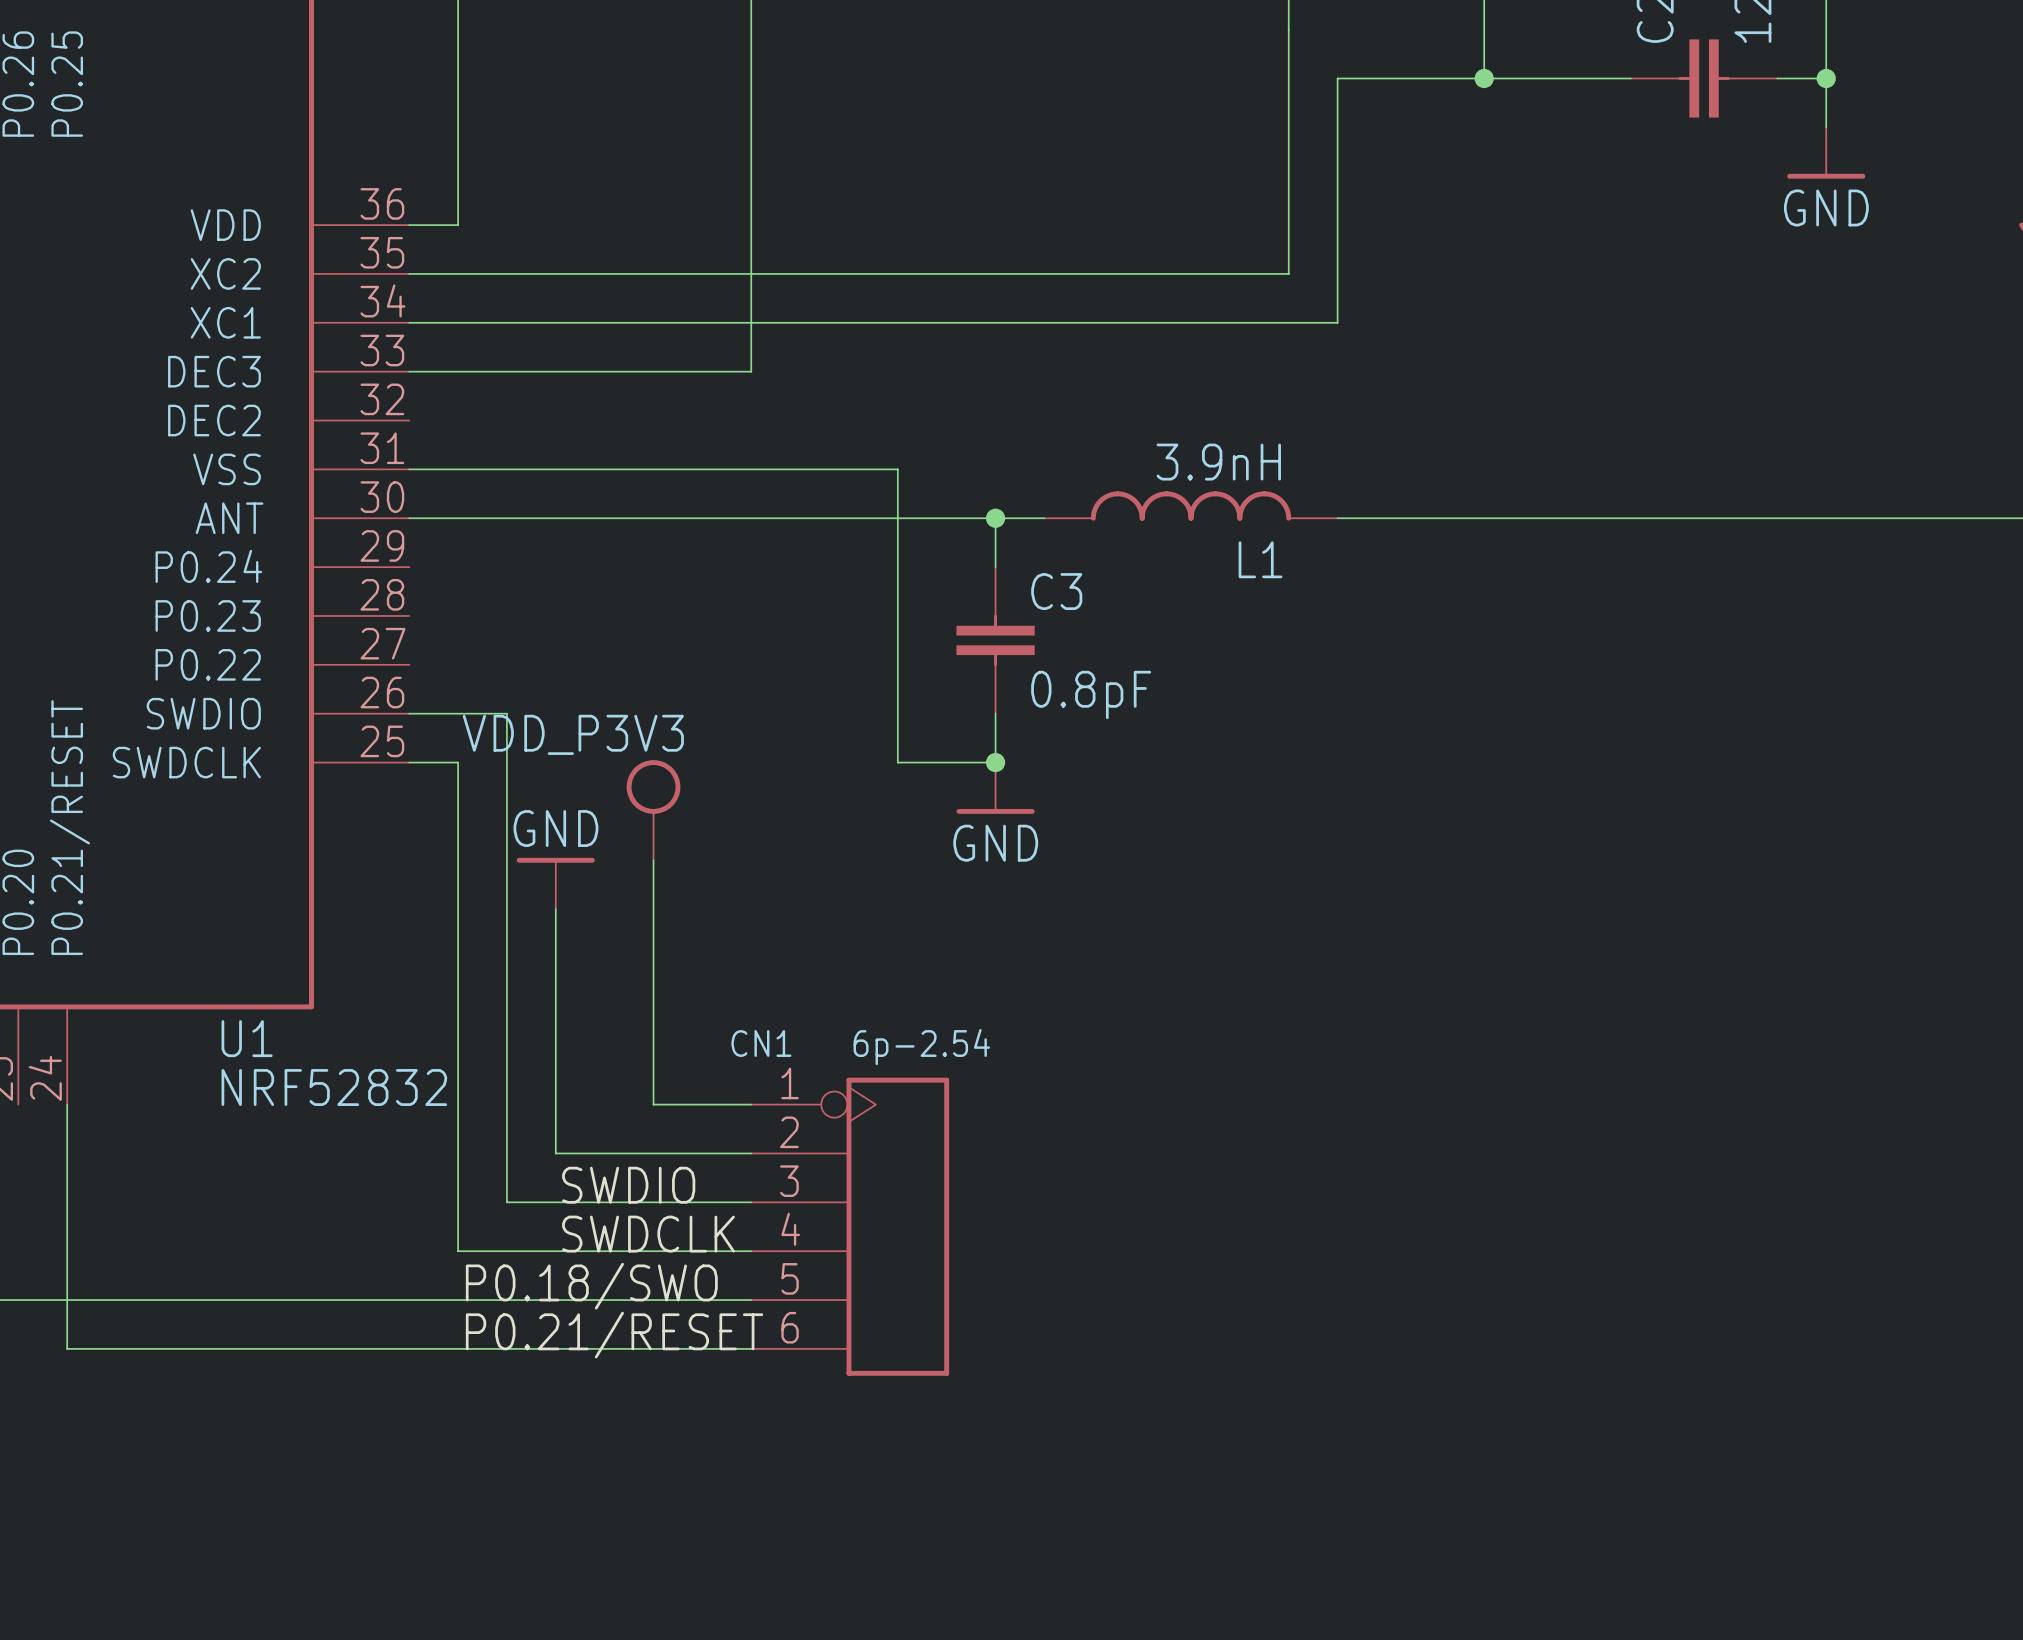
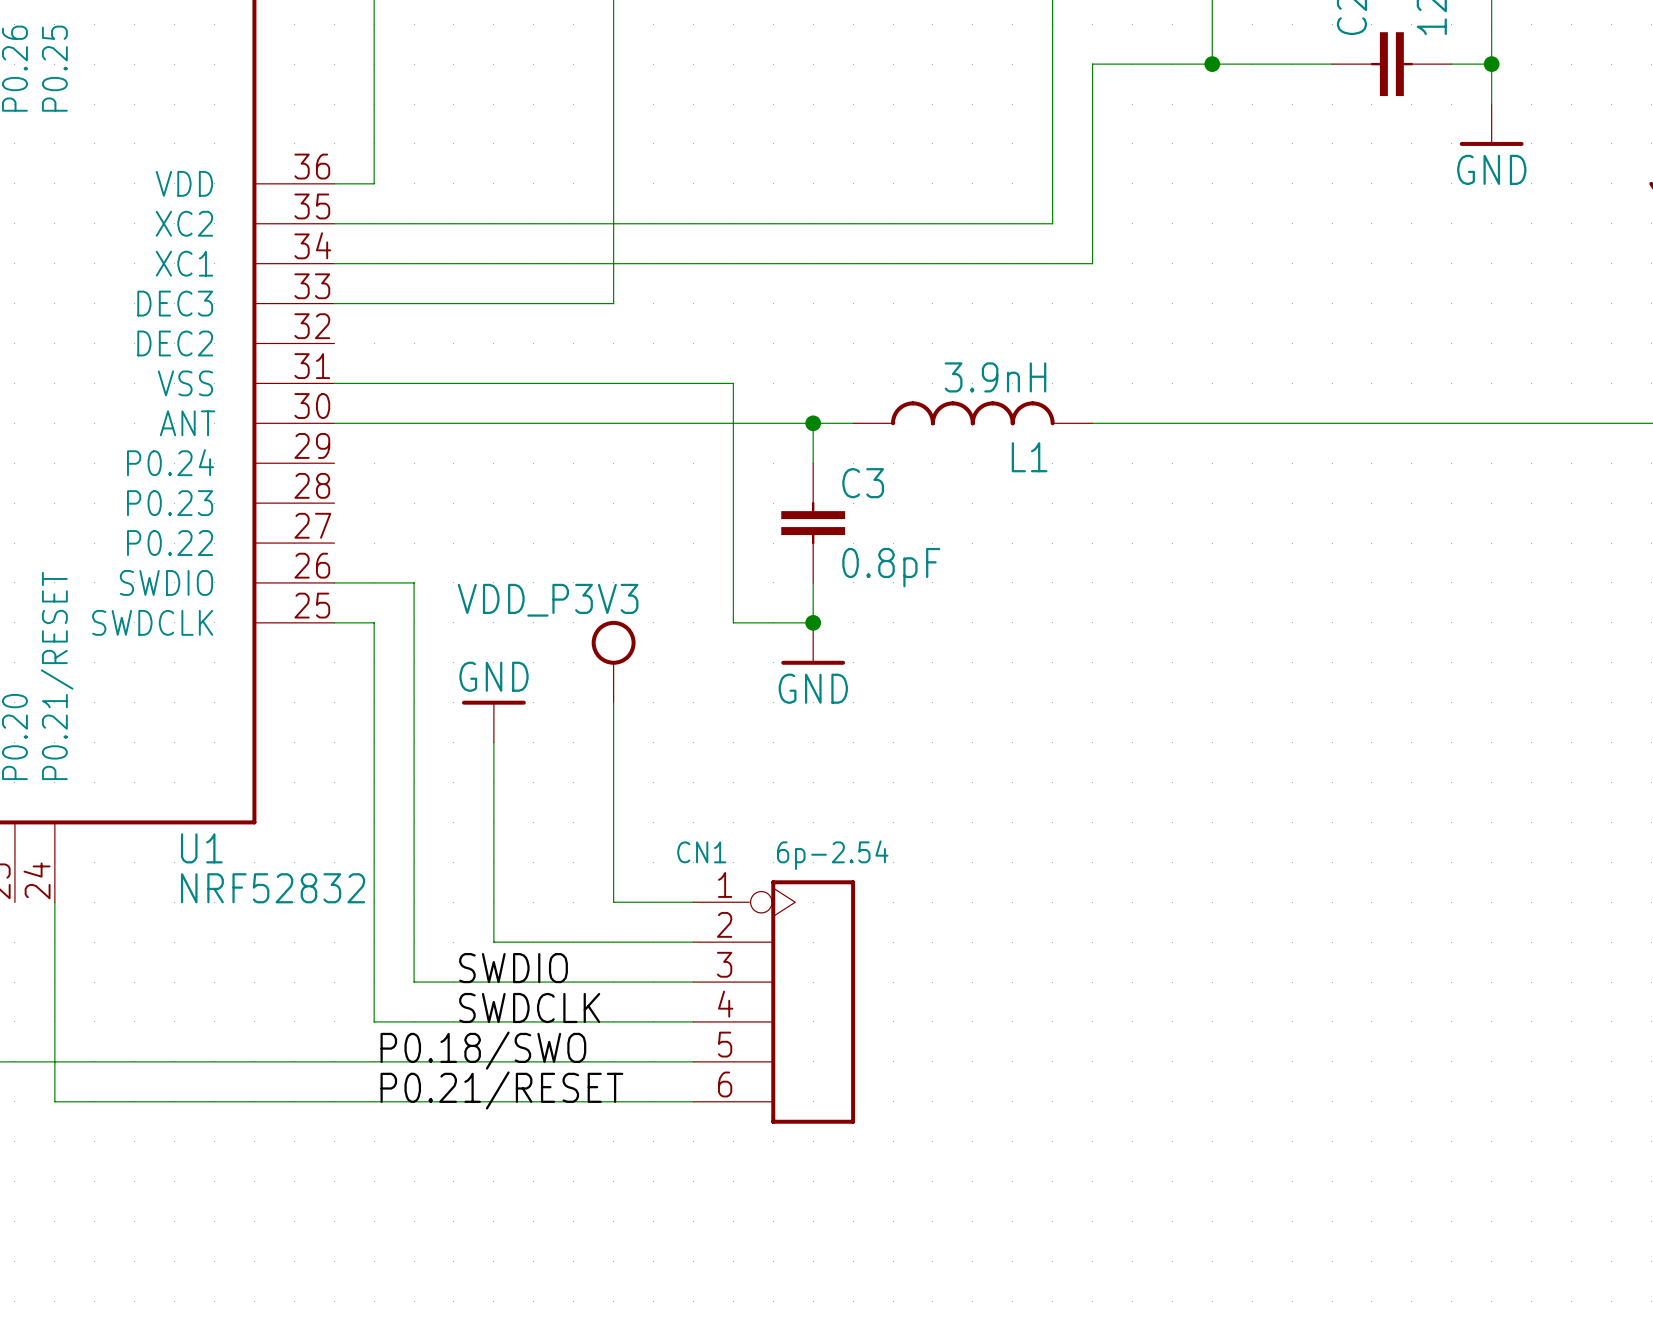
power symbol position: VDD_P3V3 (653, 810) -> VDD_P3V3 (613, 661)
wire: (653, 860) (653, 1104) (751, 1104) -> (613, 702) (613, 902) (693, 902)
power symbol position: GND (555, 883) -> GND (493, 721)
wire: (555, 909) (555, 1153) (604, 1153) -> (493, 742) (493, 942)
CN1 position: (850, 1226) -> (774, 1002)

